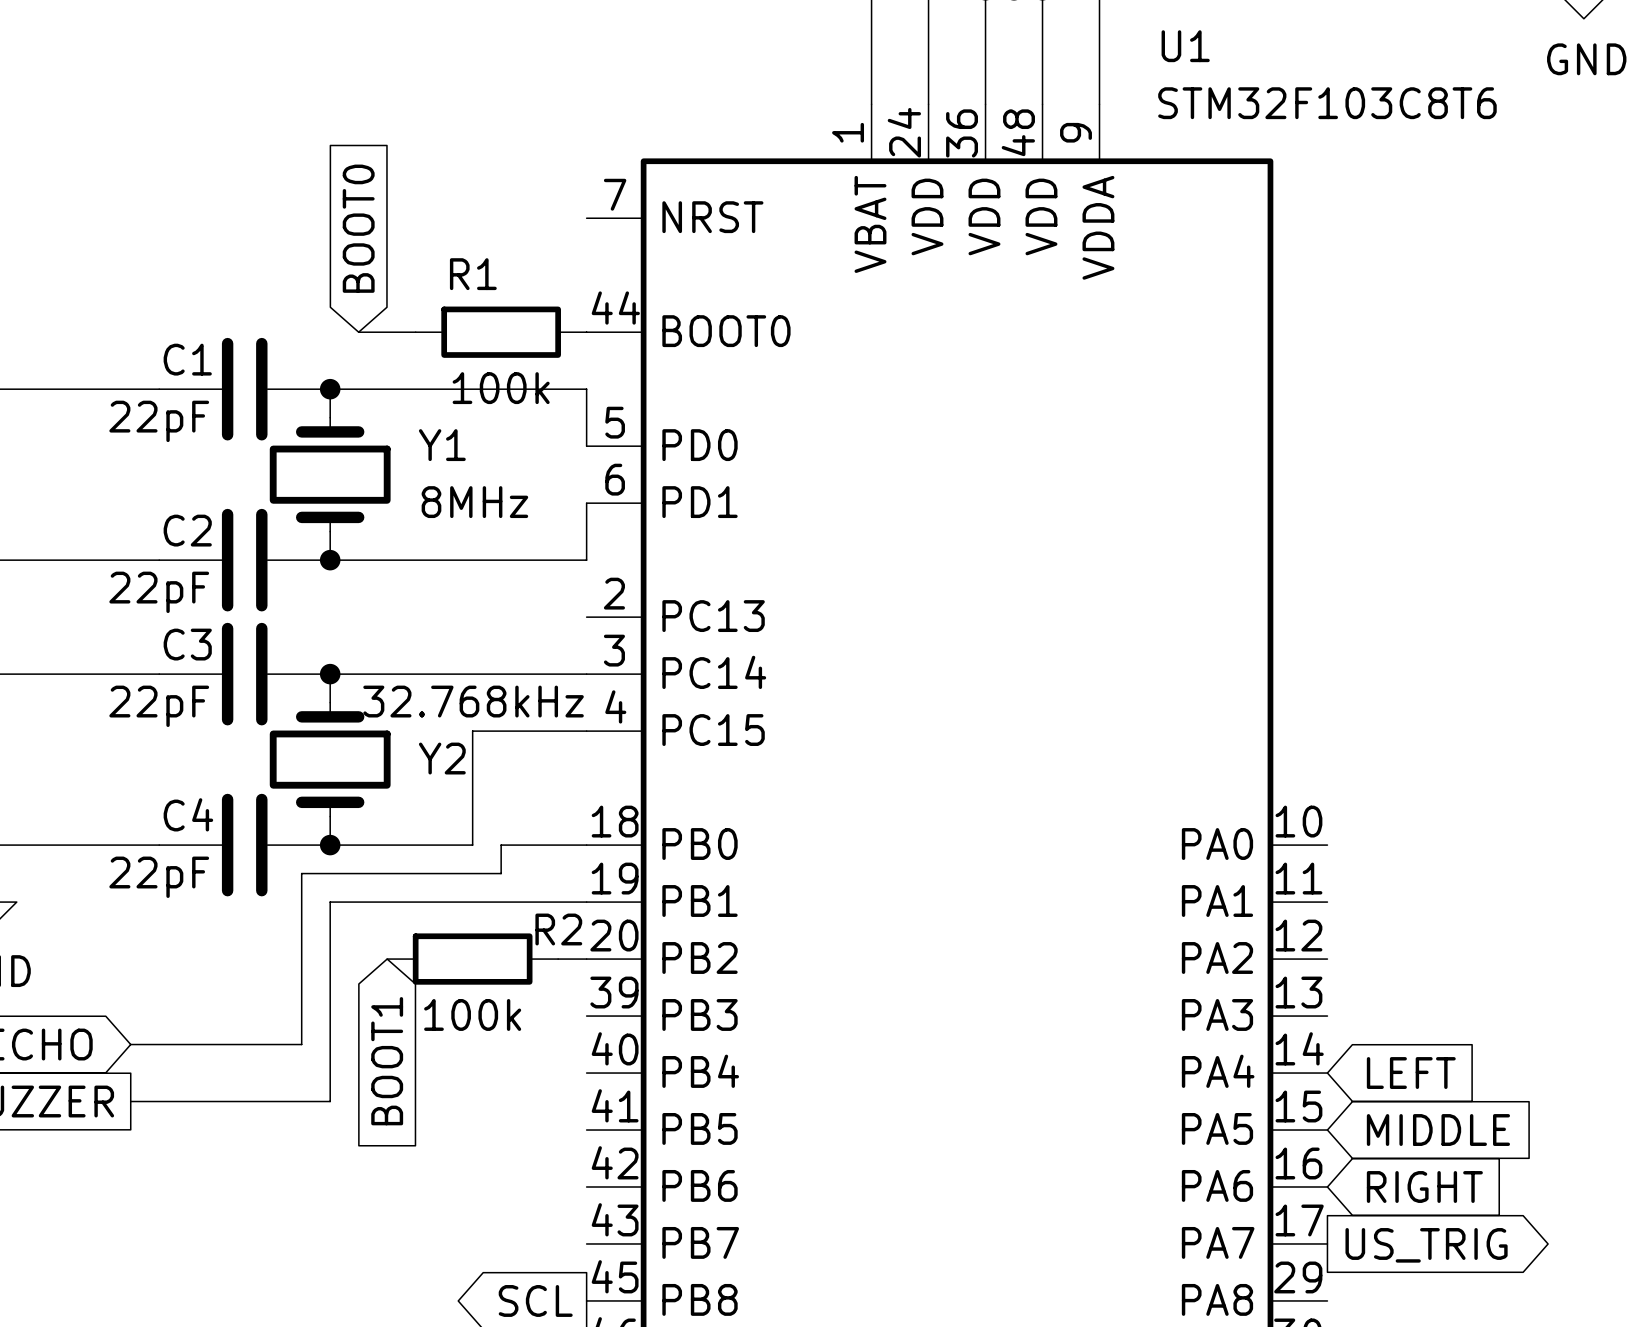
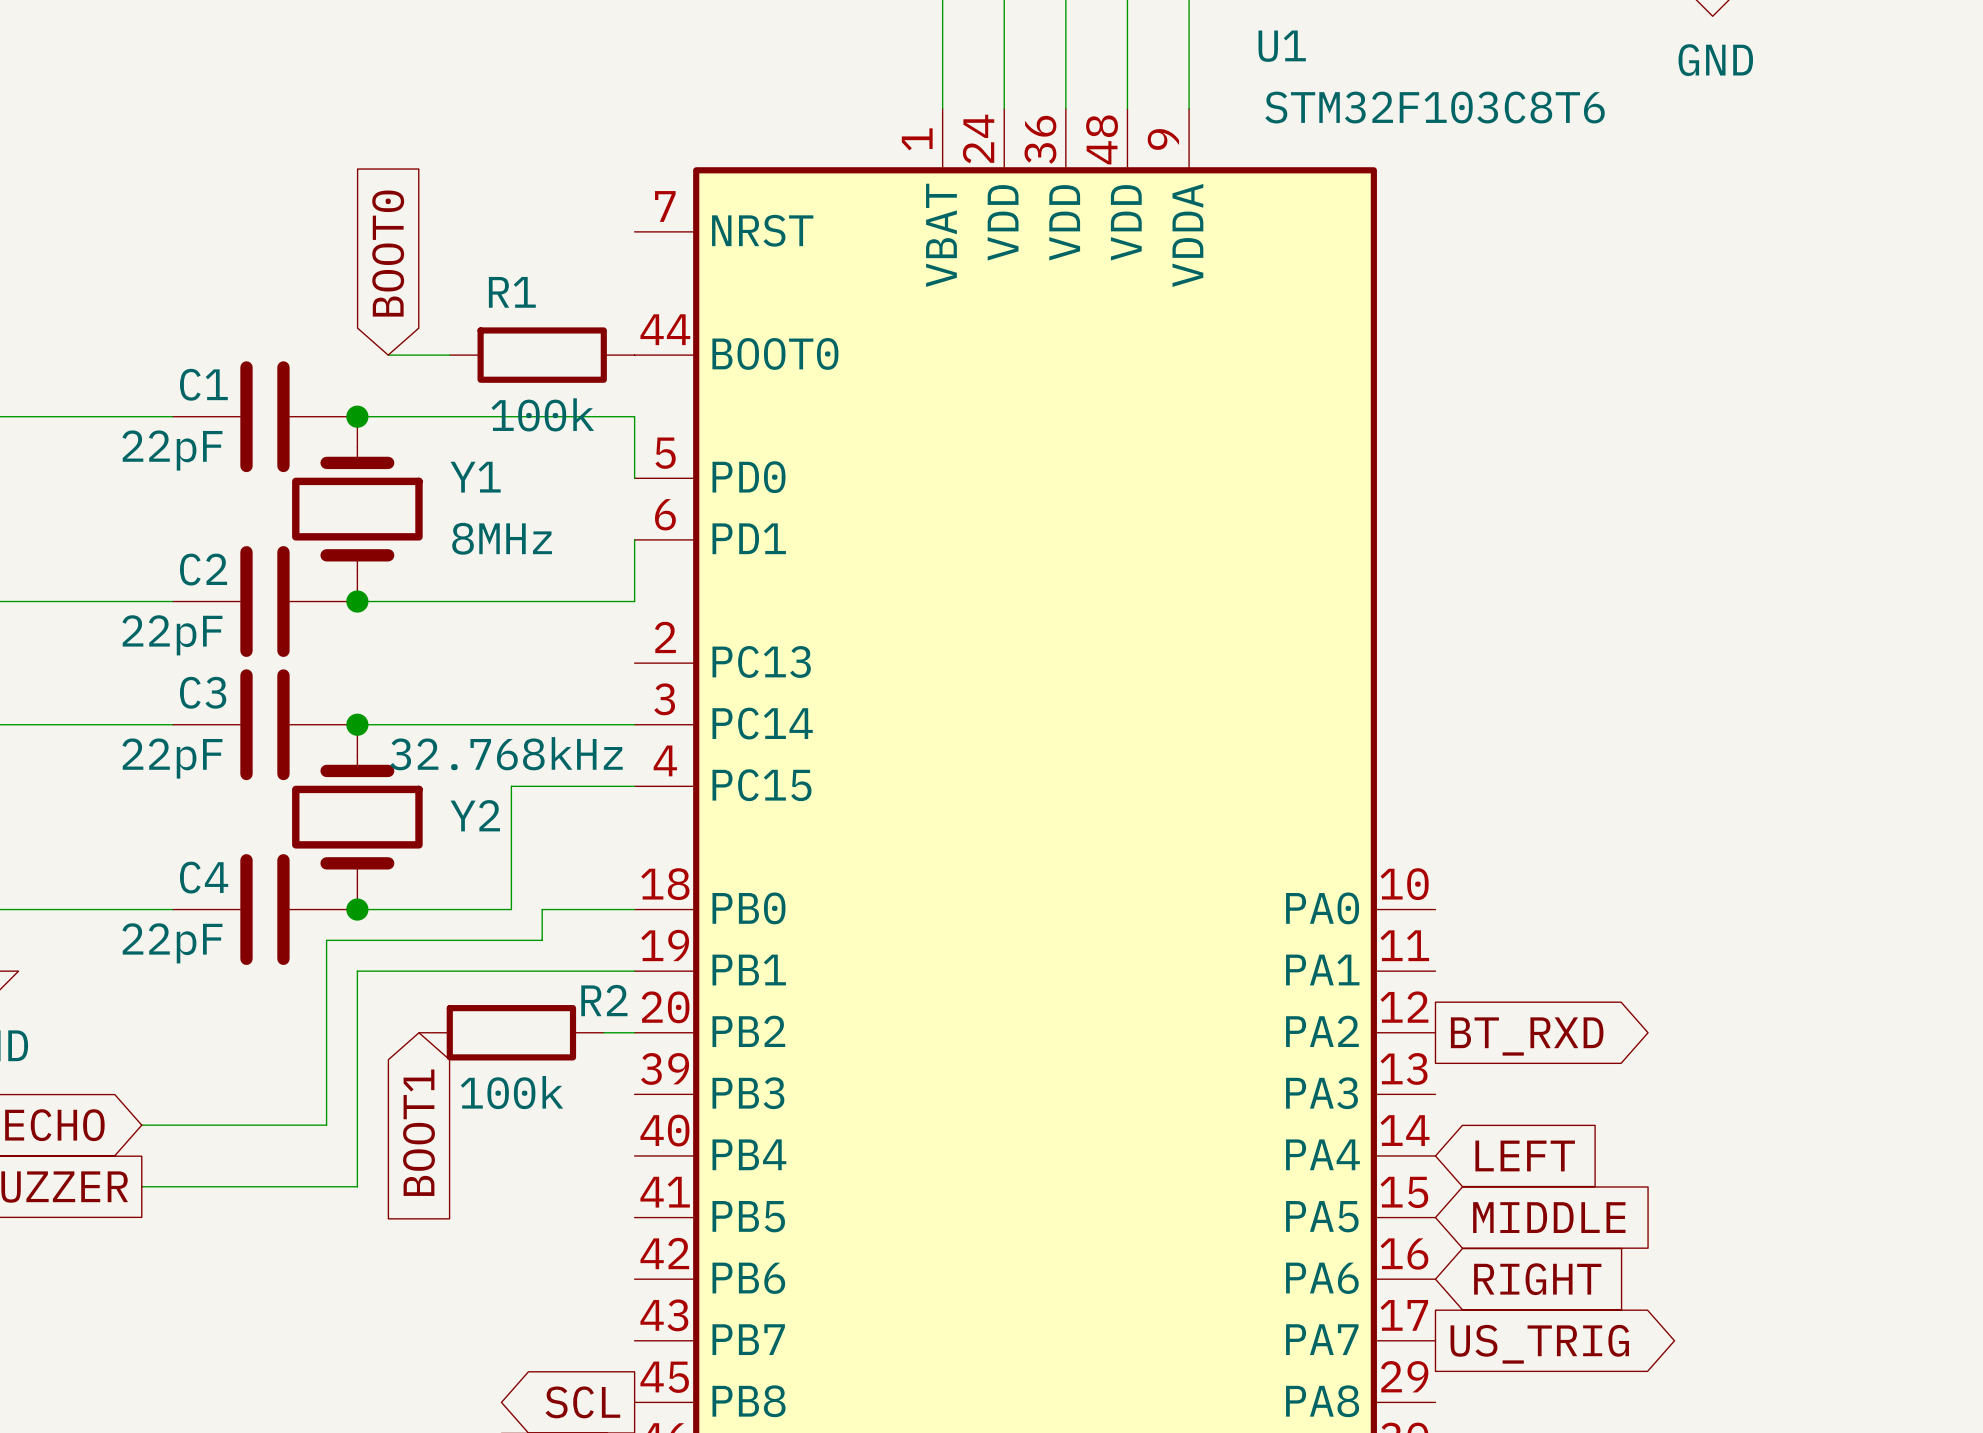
global label: none -> BT_RXD (1527, 1036)

